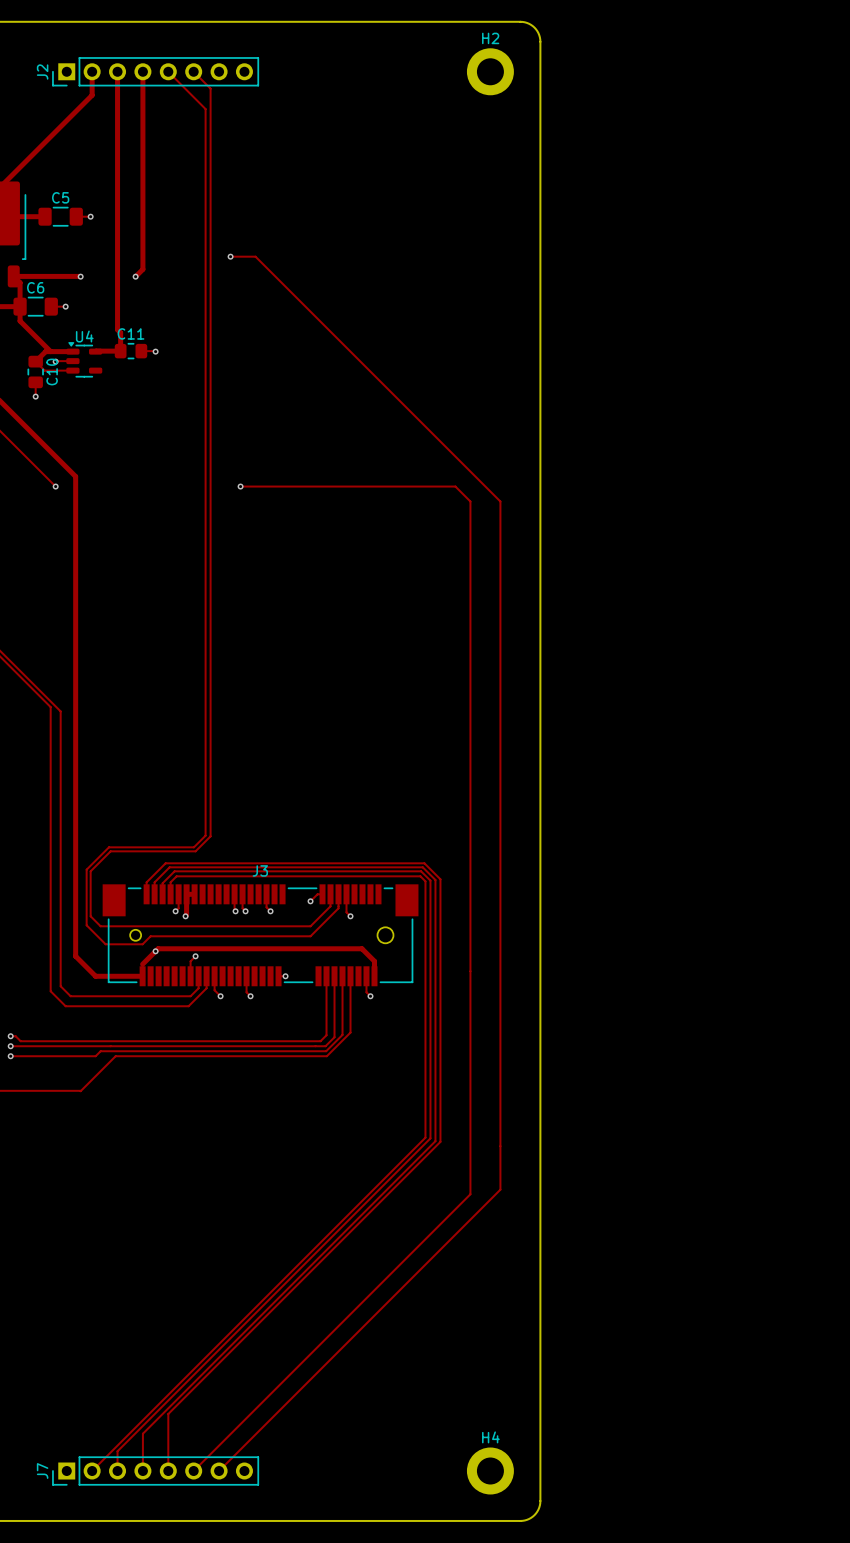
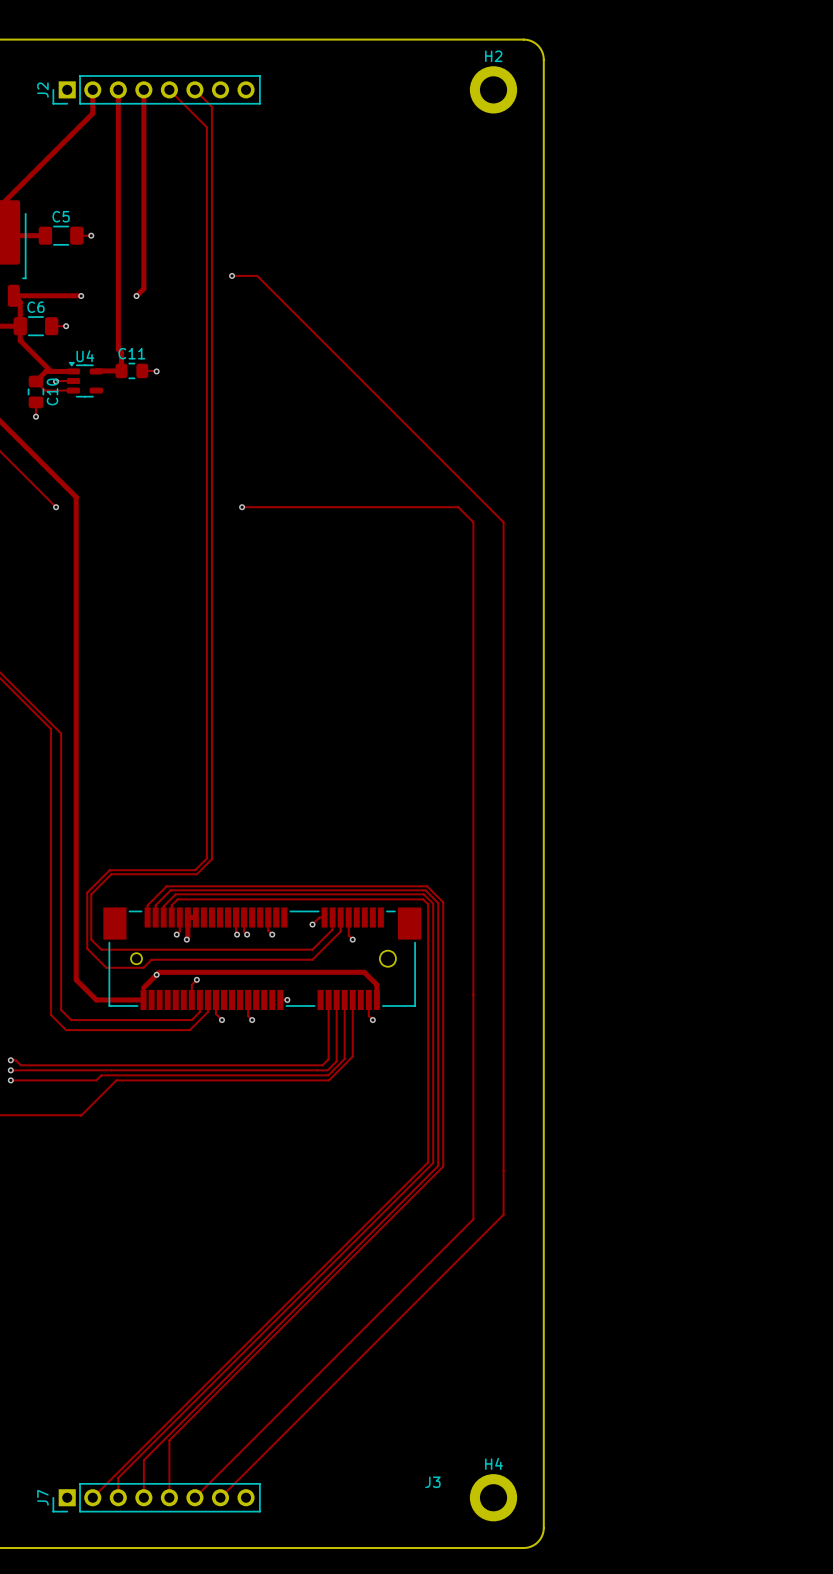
J3 name position: J3 (260, 870) -> J3 (432, 1482)

